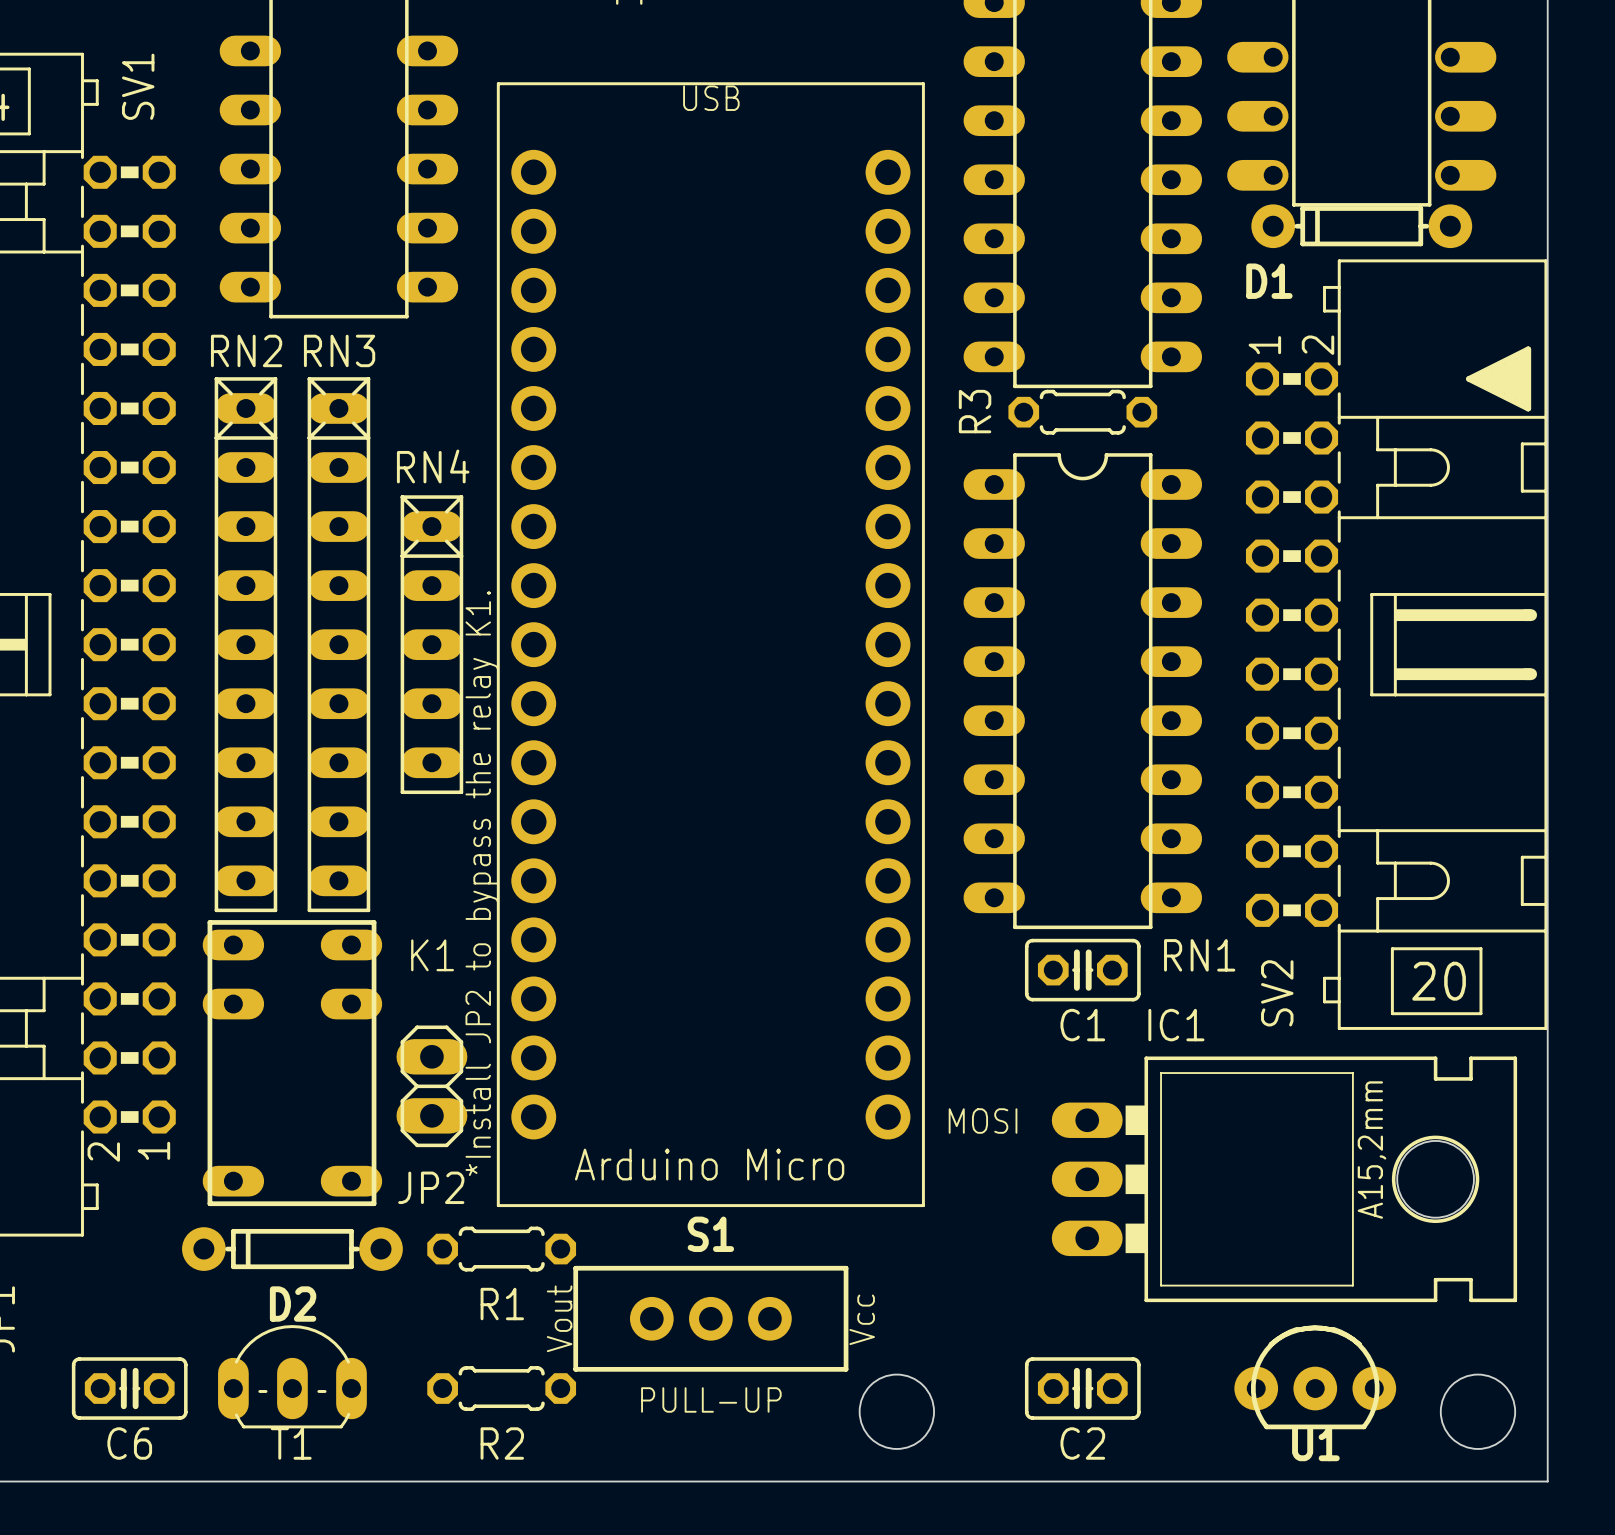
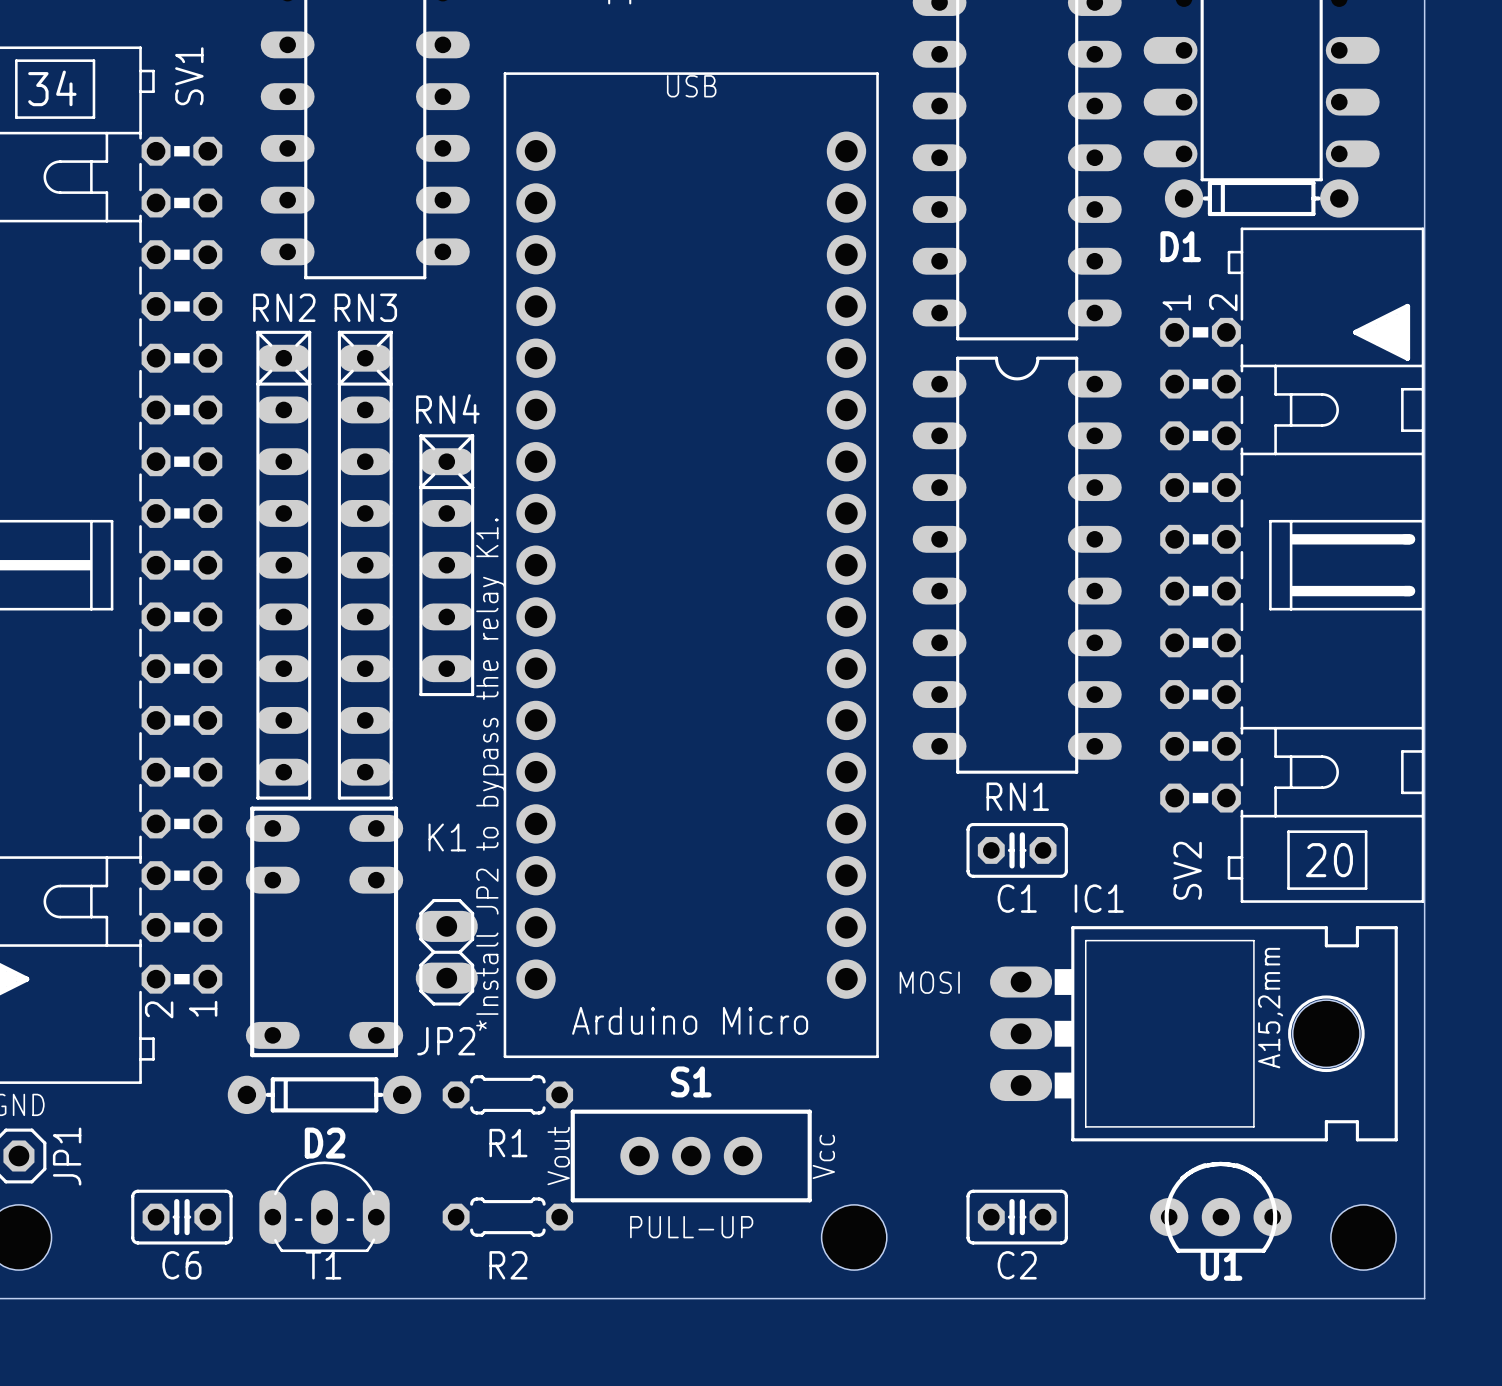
R3: (1082, 412) -> none
RN1 position: (1082, 691) -> (1017, 565)
RN1 name position: RN1 (1199, 955) -> RN1 (1017, 796)

